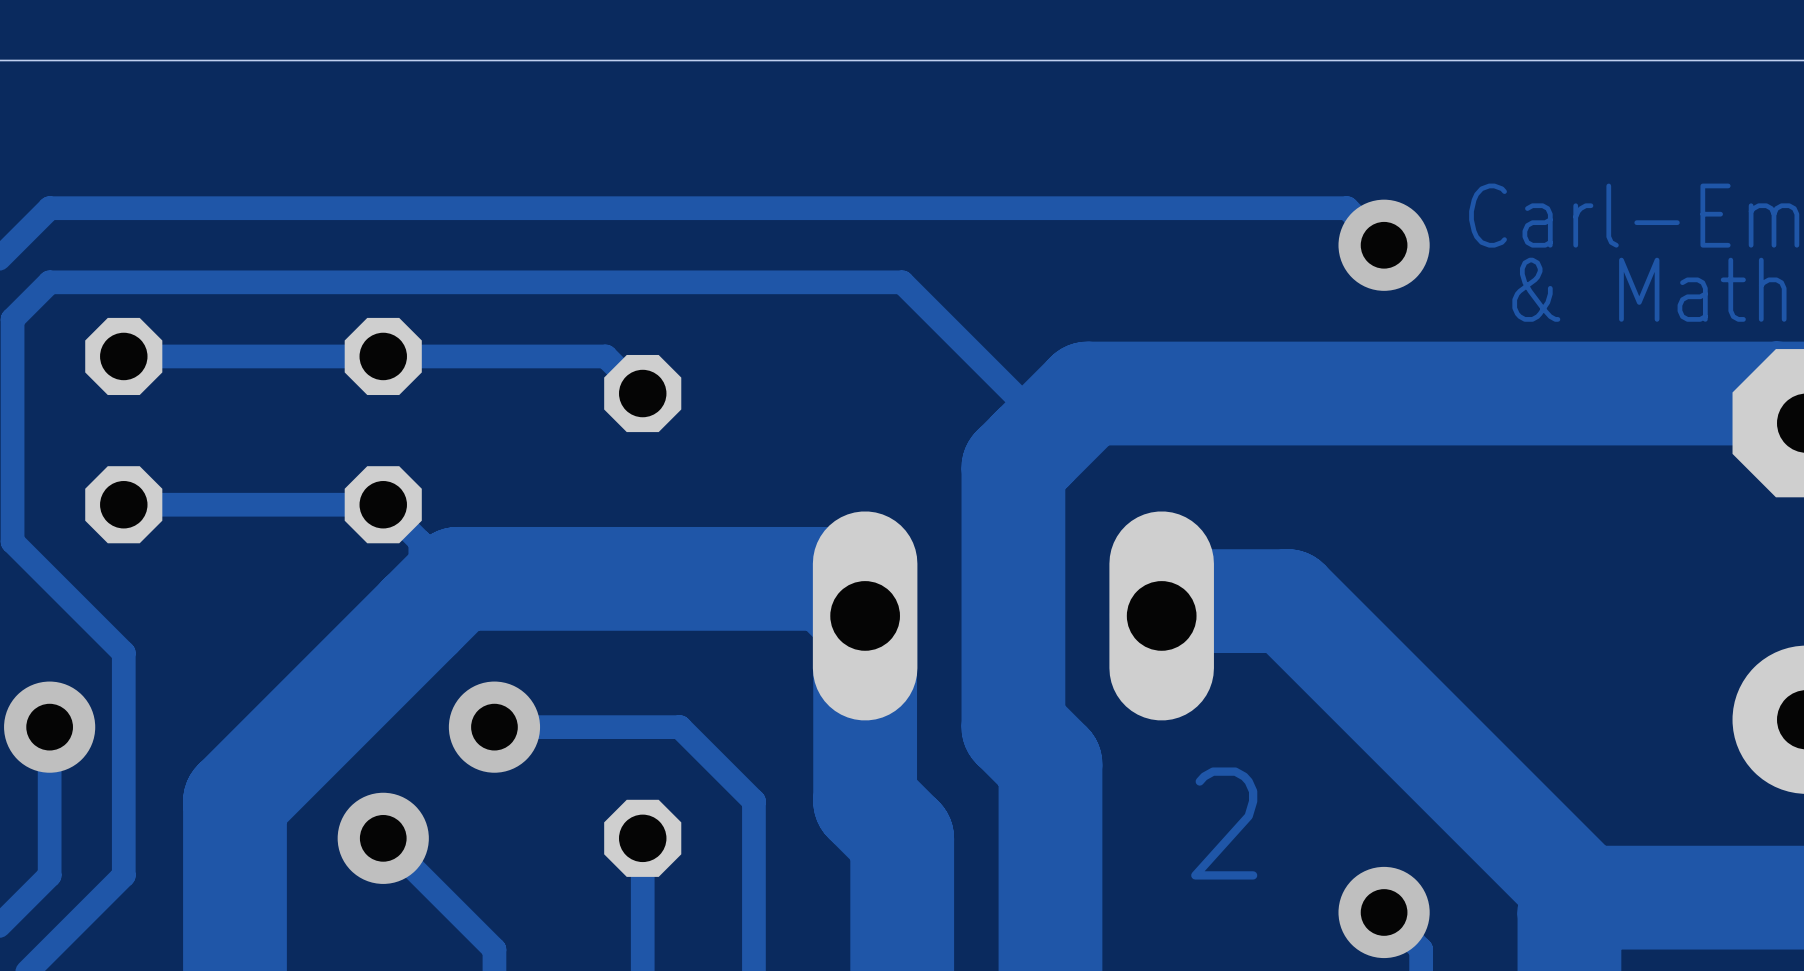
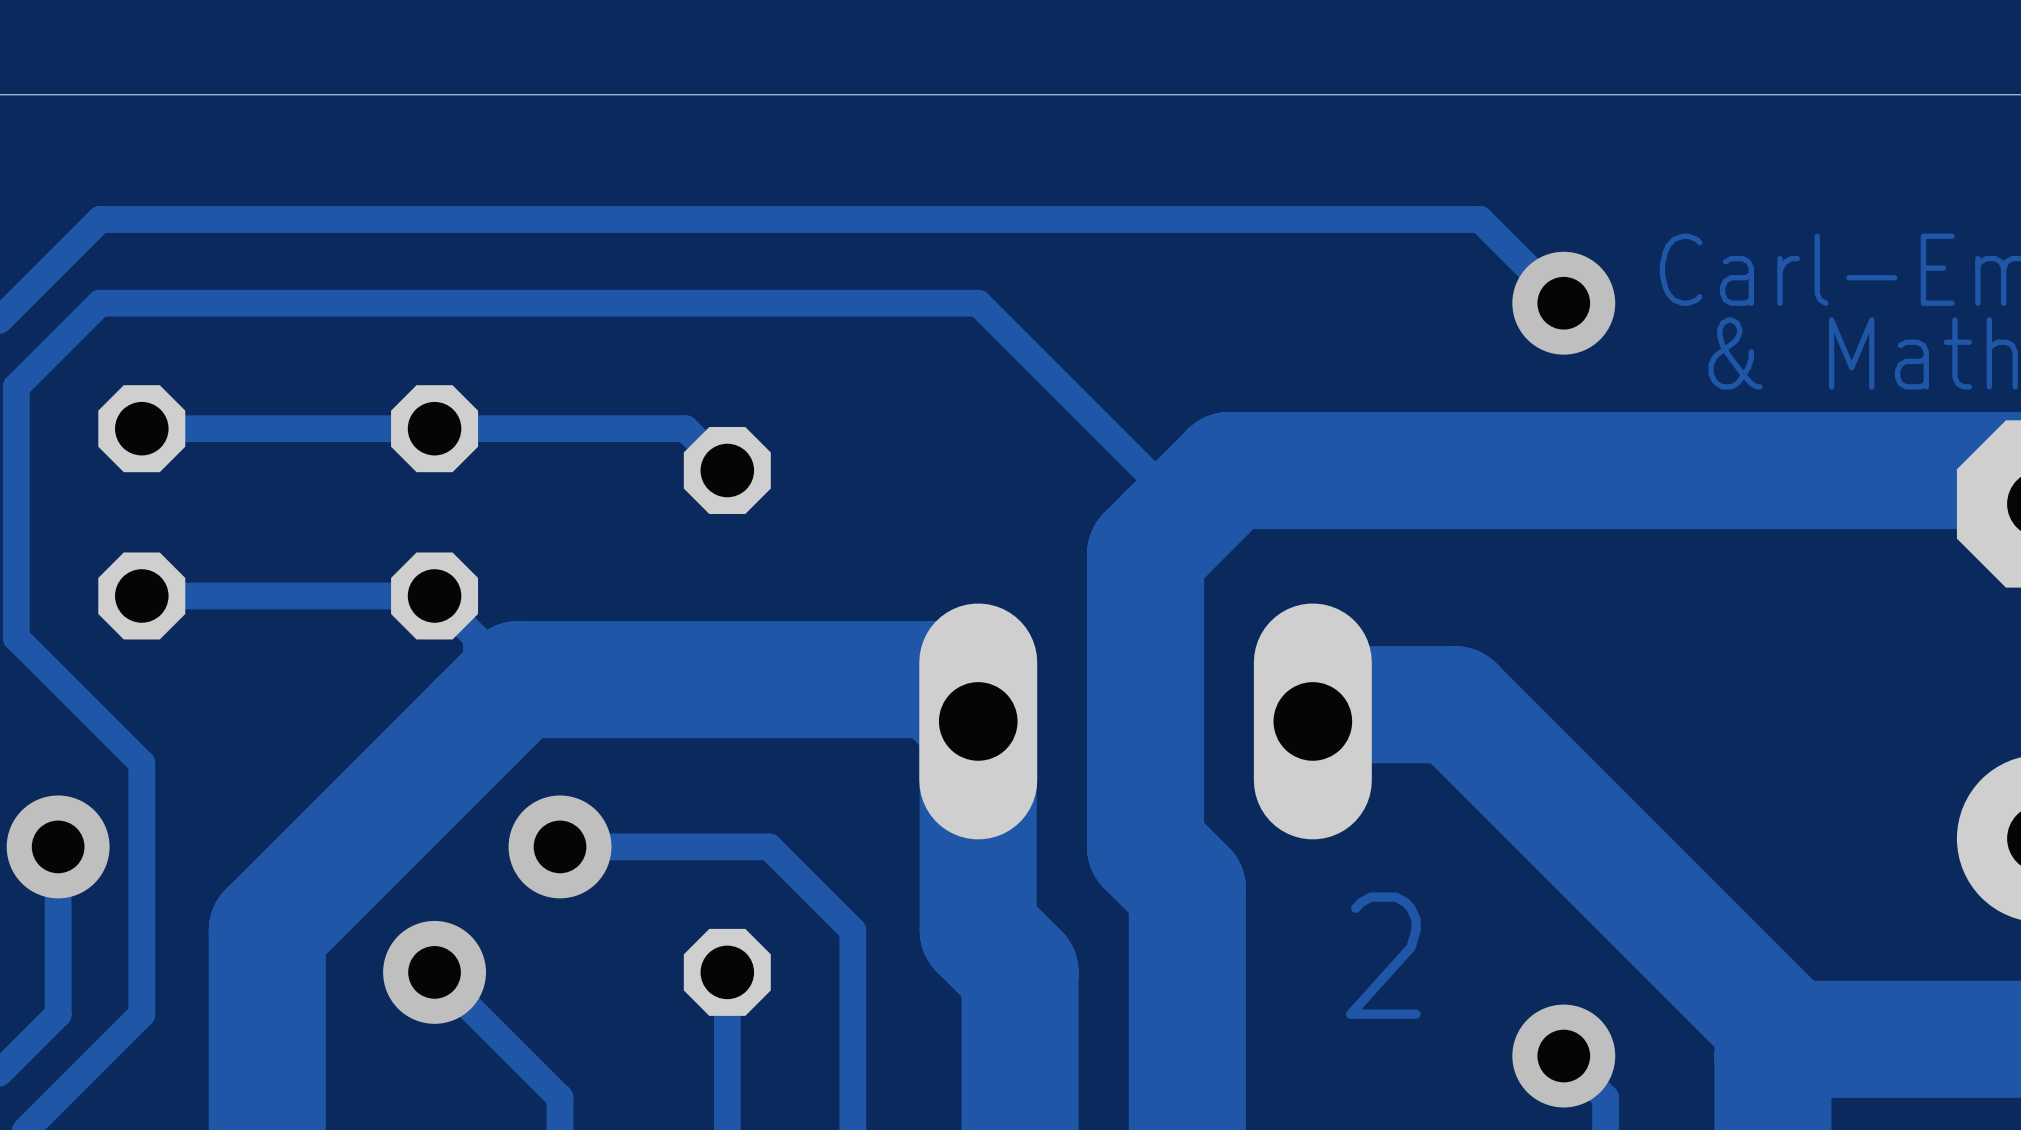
track: (1347, 208) (49, 208) -> (1521, 261) (1480, 219) (99, 219) (58, 261)
track: (902, 282) (49, 282) -> (1020, 345) (978, 303) (99, 303) (58, 345)

